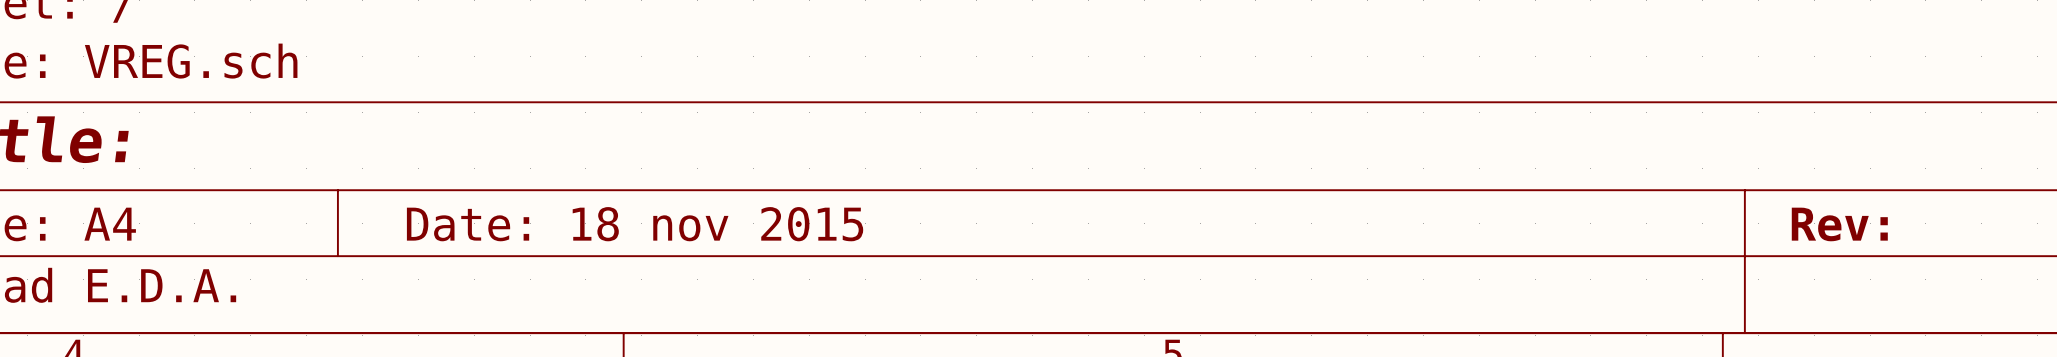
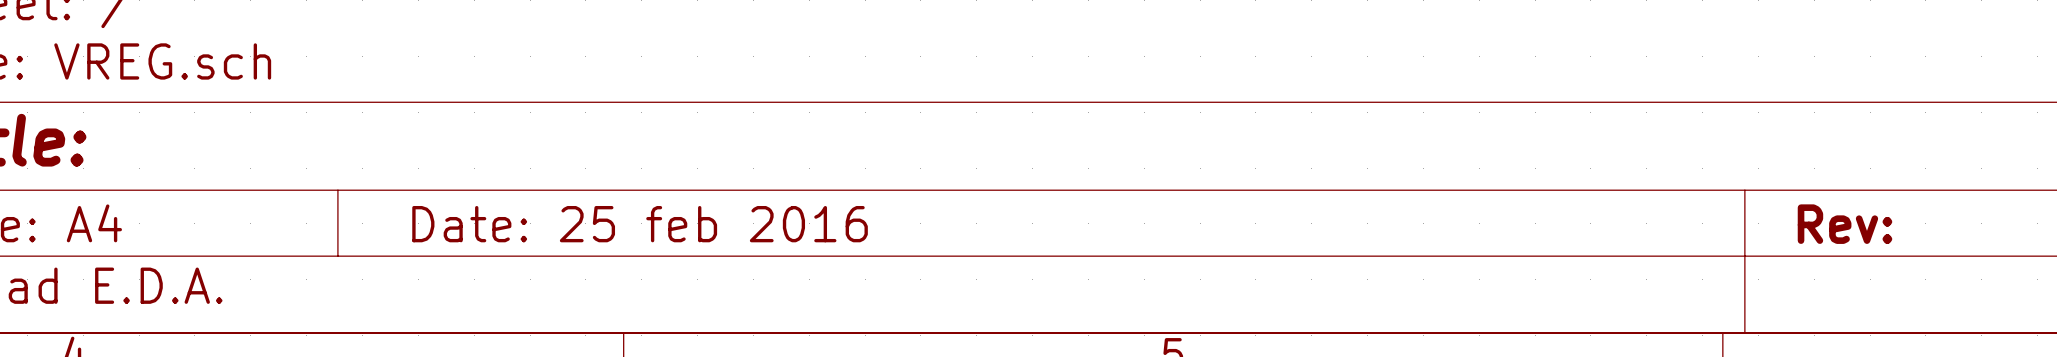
title block: Date: 18 nov 2015 (635, 224) -> Date: 25 feb 2016 (640, 224)

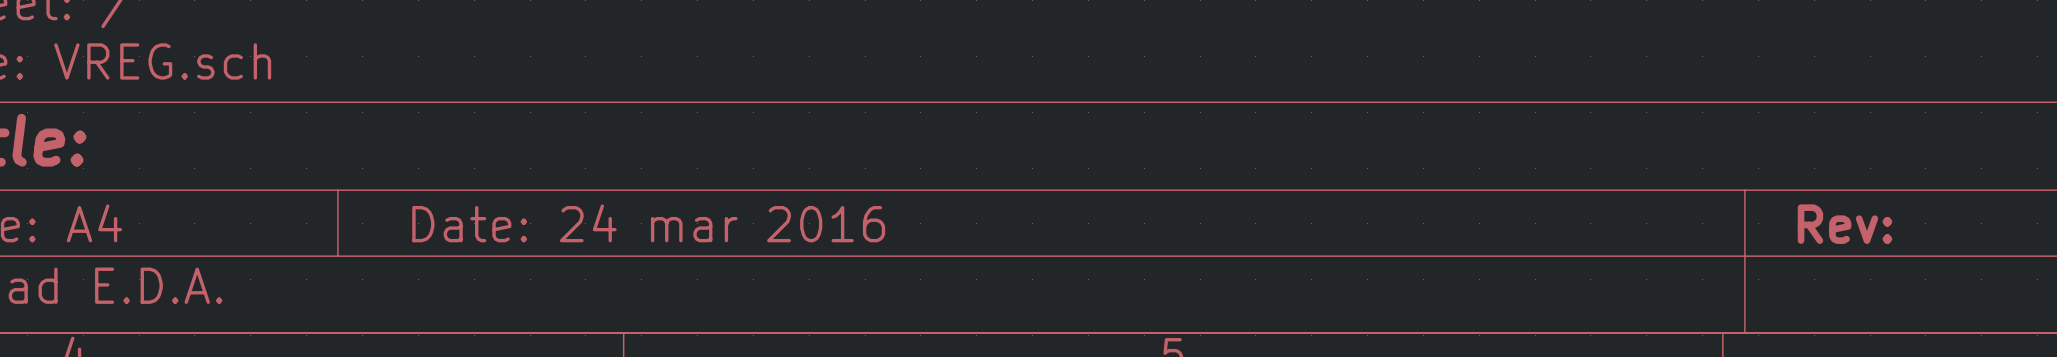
title block: Date: 25 feb 2016 (640, 224) -> Date: 24 mar 2016 (648, 223)

